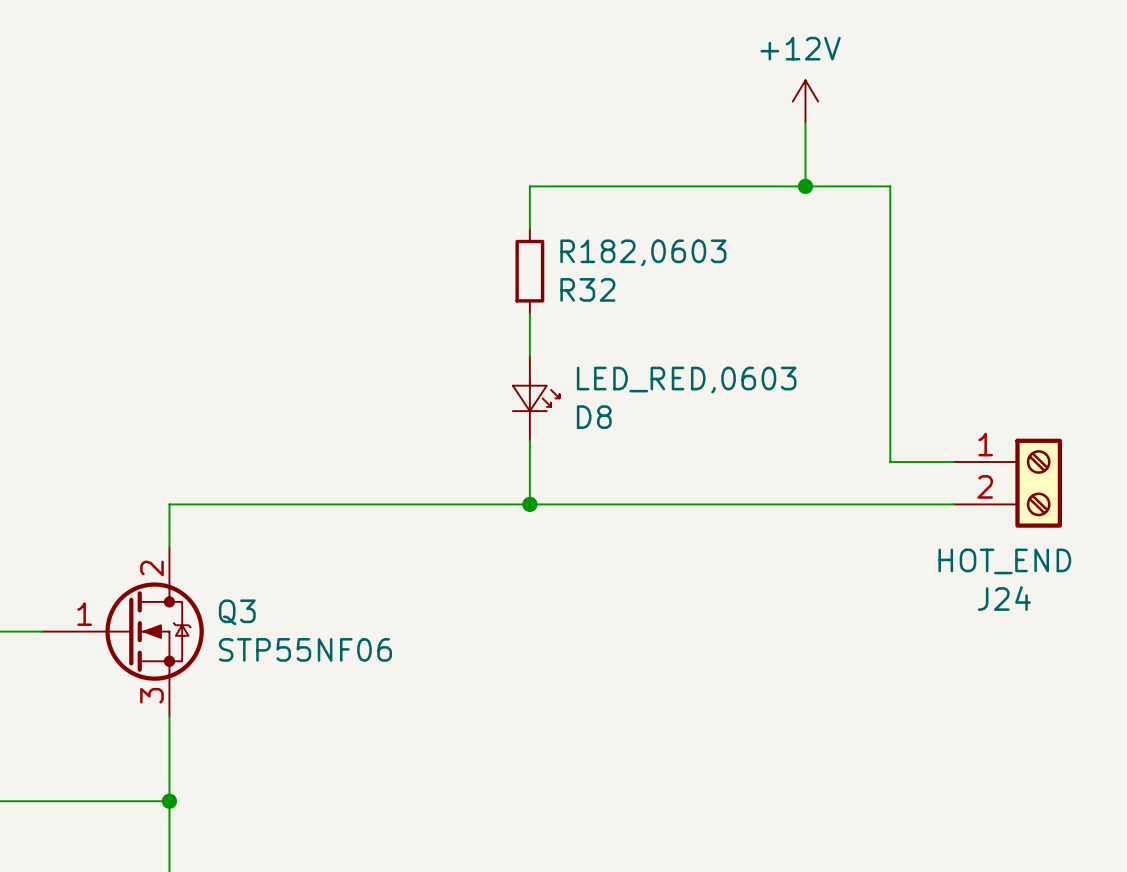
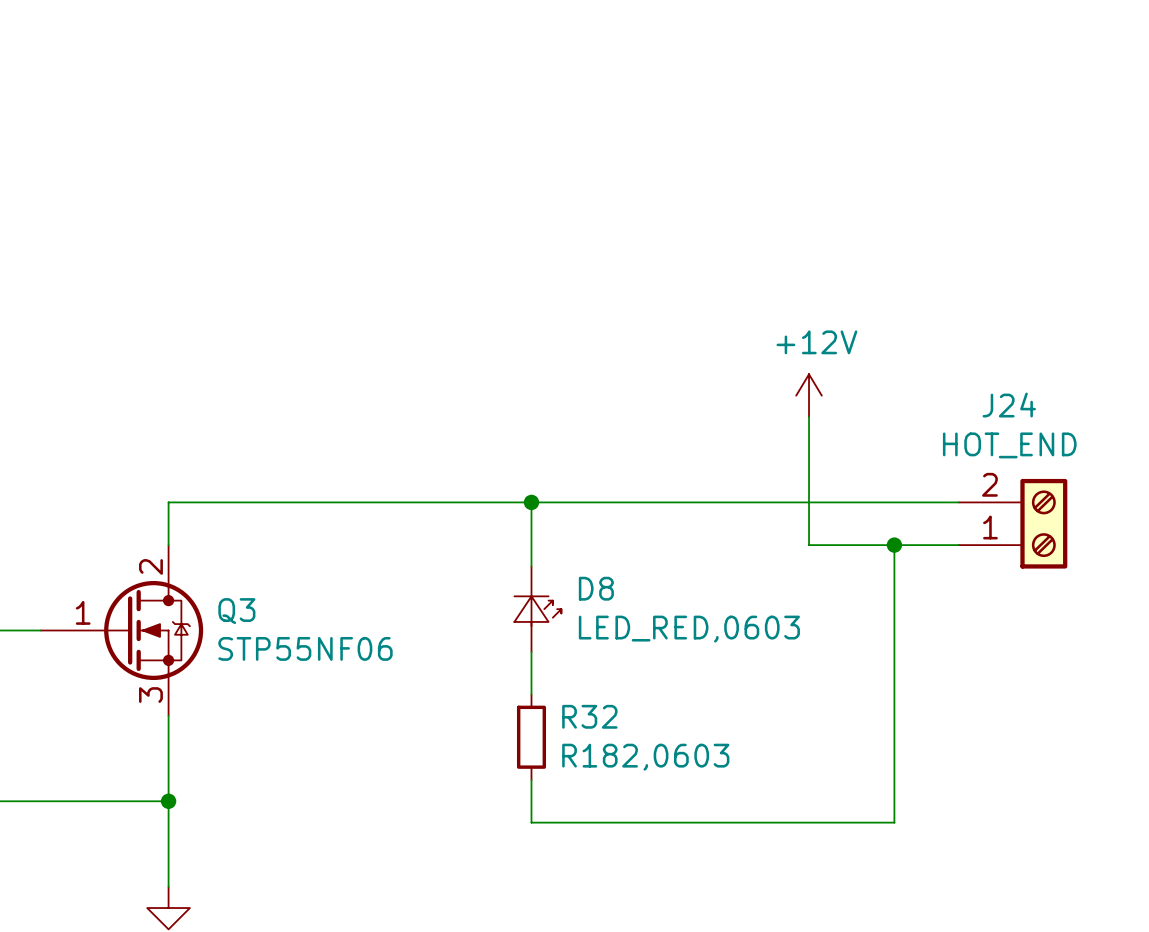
power symbol text position: +12V (800, 48) -> +12V (816, 342)
power symbol position: +12V (805, 101) -> +12V (809, 395)
wire: (805, 122) (805, 186) -> none
junction: (805, 186) -> none
wire: (529, 228) (529, 186) (890, 186) (890, 462) (953, 462) -> none
R32 value position: R182,0603 (643, 252) -> R182,0603 (645, 757)
R32 position: (529, 271) -> (531, 737)
R32 name position: R32 (587, 289) -> R32 (589, 716)
wire: (529, 313) (529, 356) -> (531, 651) (531, 694)
D8 flip: as is (536, 396) -> up-down (537, 611)
D8 position: (536, 398) -> (537, 609)
wire: none -> (809, 417) (809, 545) (958, 545)
wire: (529, 440) (529, 504) -> (531, 566) (531, 502)
J24 flip: as is (1038, 483) -> up-down (1043, 523)
wire: none -> (894, 545) (894, 822) (531, 822) (531, 779)
junction: none -> (894, 545)

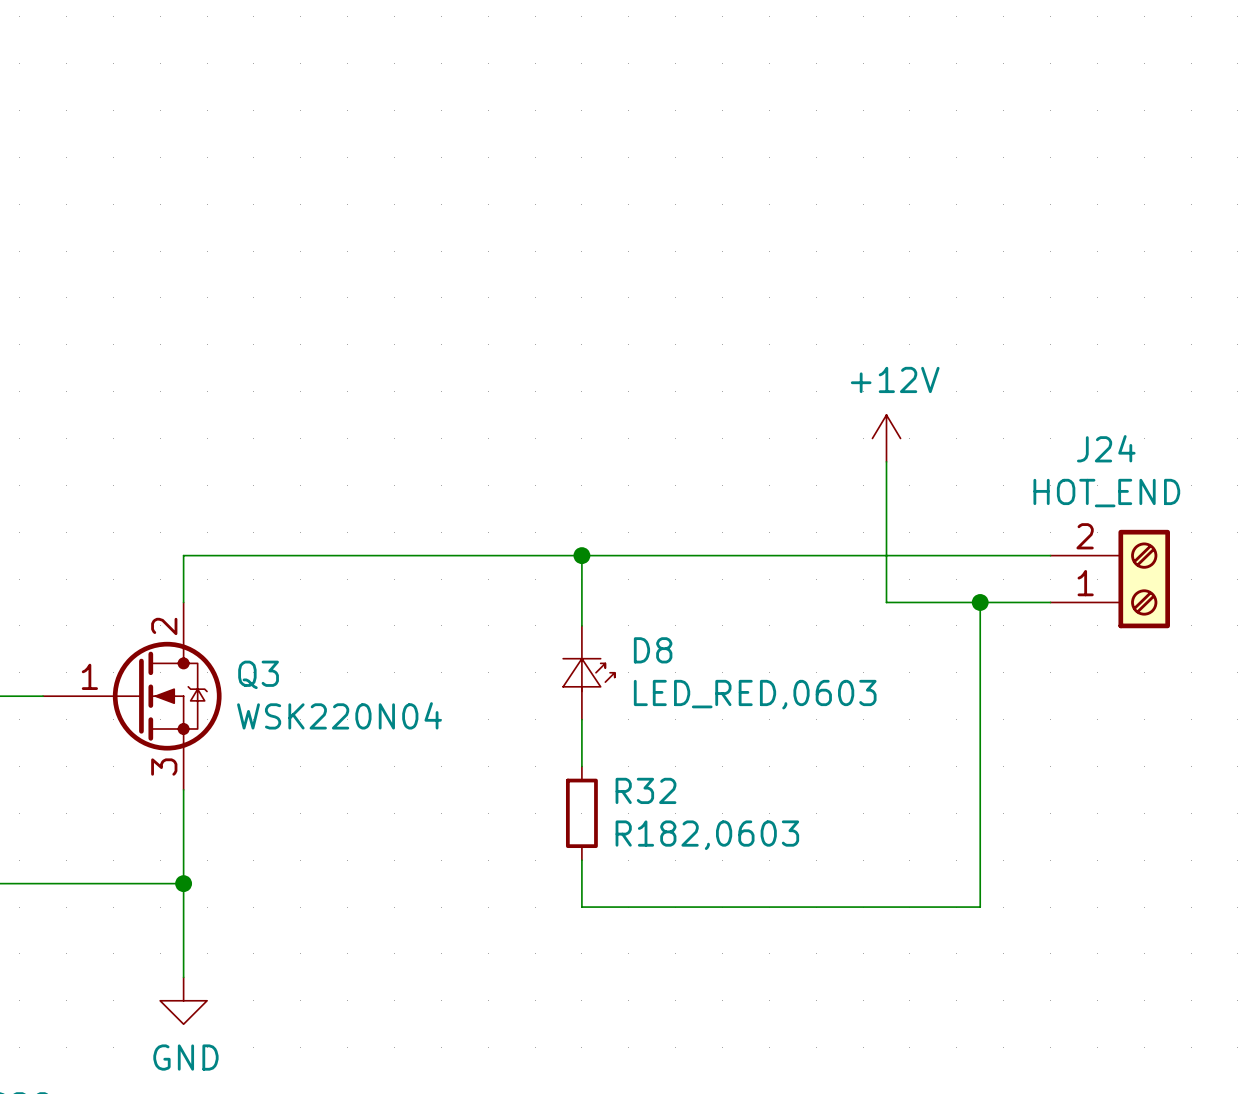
Q3 value: STP55NF06 (305, 648) -> WSK220N04 (339, 715)

